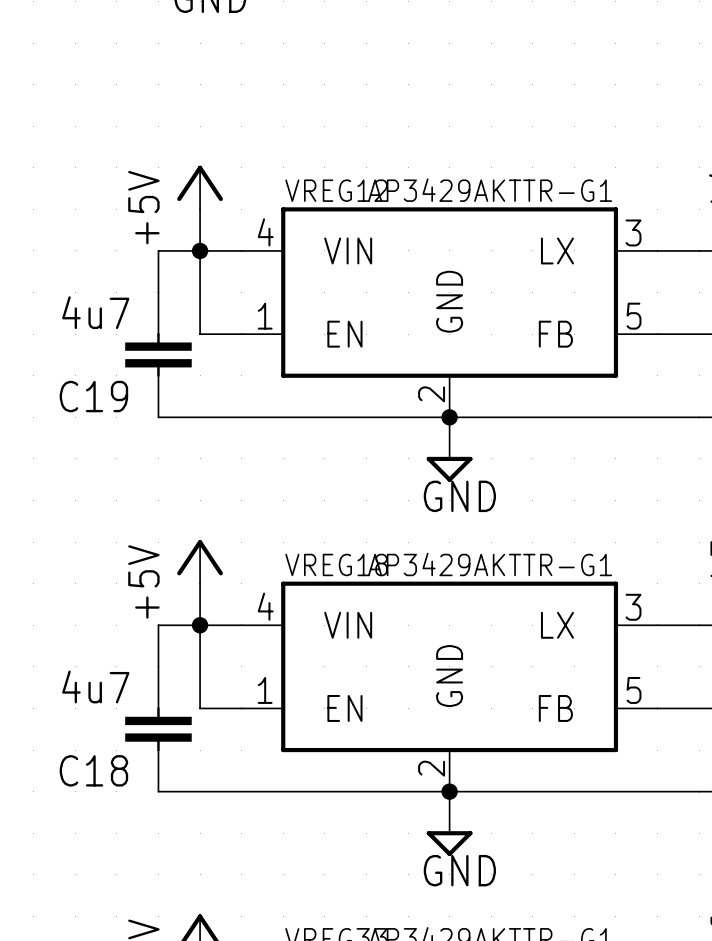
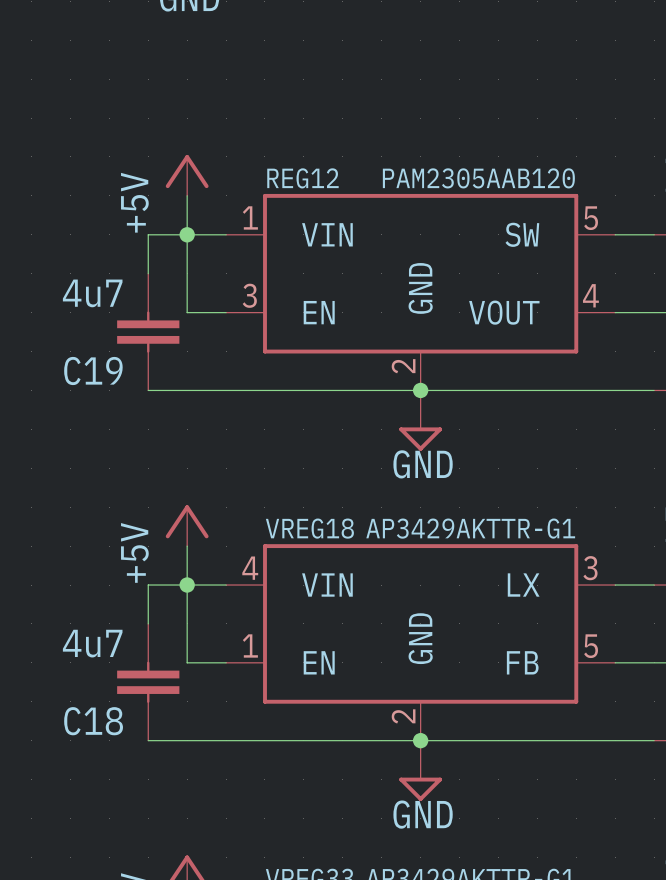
VREG12 name: VREG12 (336, 190) -> REG12 (302, 178)
VREG12 value: AP3429AKTTR-G1 (490, 190) -> PAM2305AAB120 (478, 178)
VREG12 pin number: 4 (265, 232) -> 1 (250, 217)
VREG12 pin number: 3 (633, 232) -> 5 (591, 218)
VREG12 pin name: LX (557, 250) -> SW (522, 234)
VREG12 pin number: 1 (265, 316) -> 3 (249, 295)
VREG12 pin number: 5 (634, 316) -> 4 (590, 295)
VREG12 pin name: FB (555, 334) -> VOUT (504, 312)

